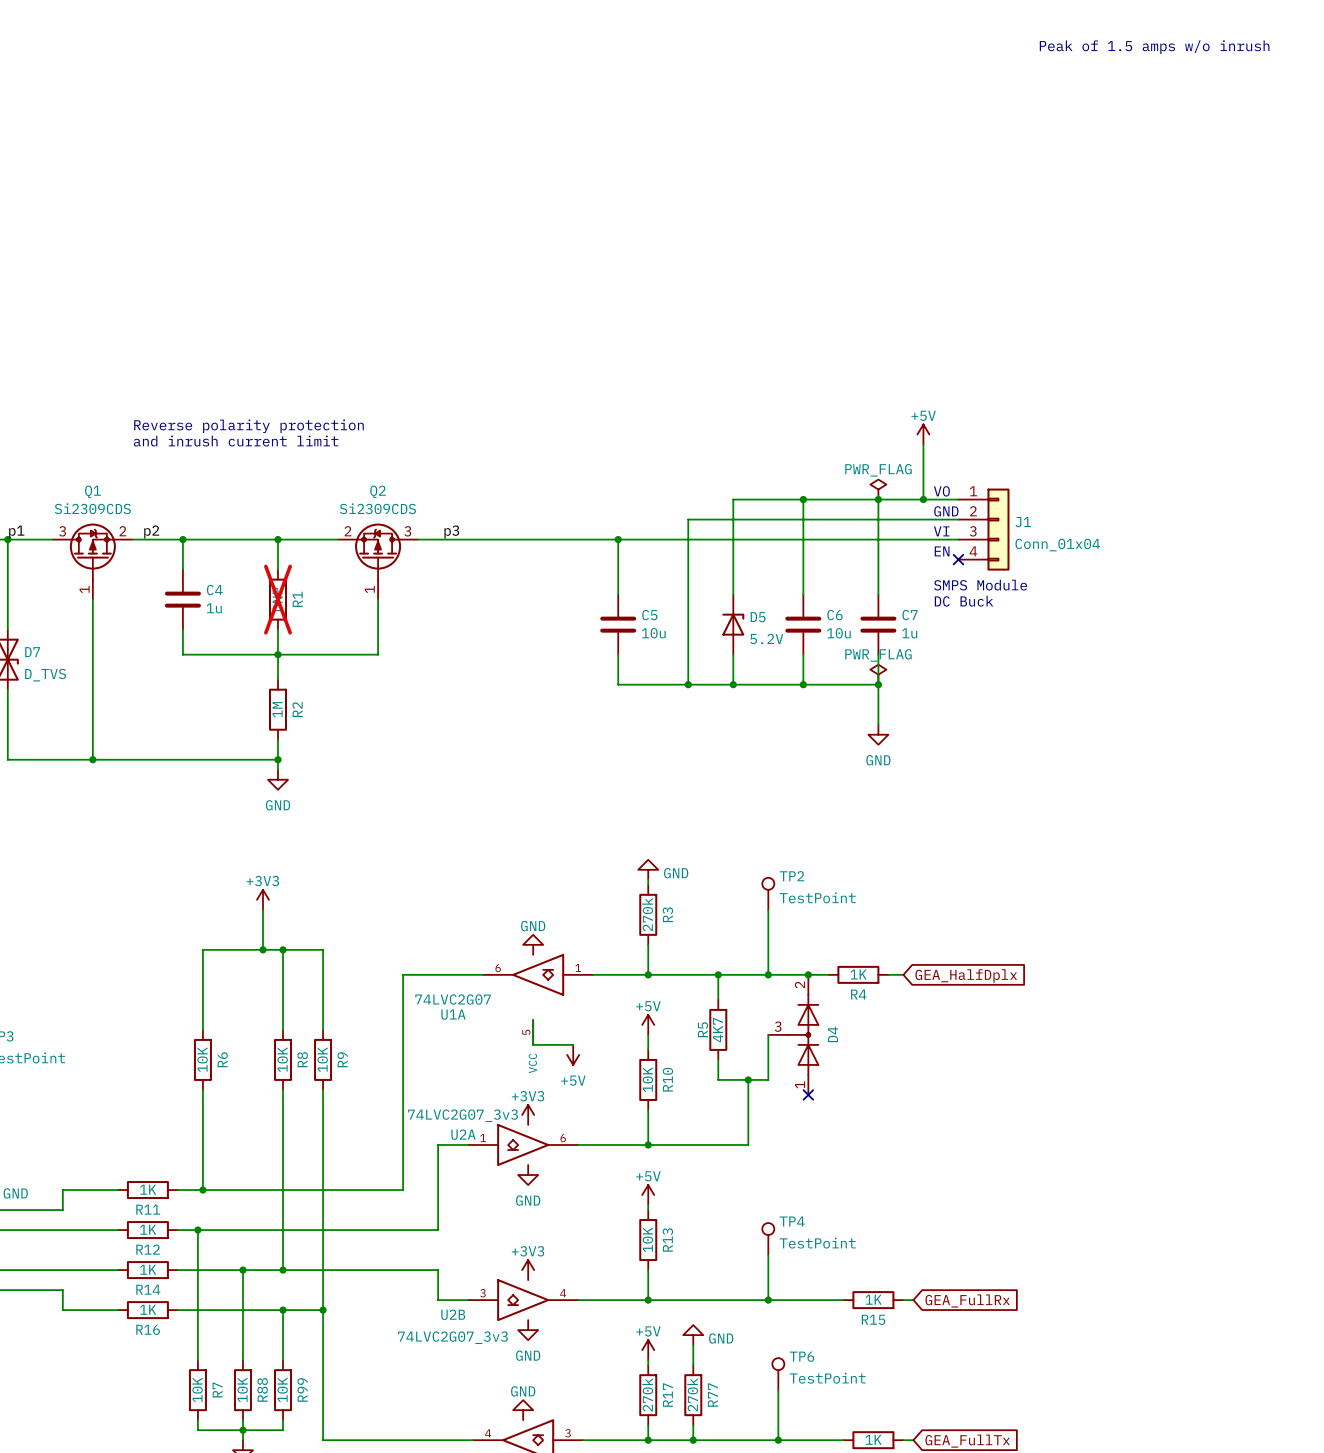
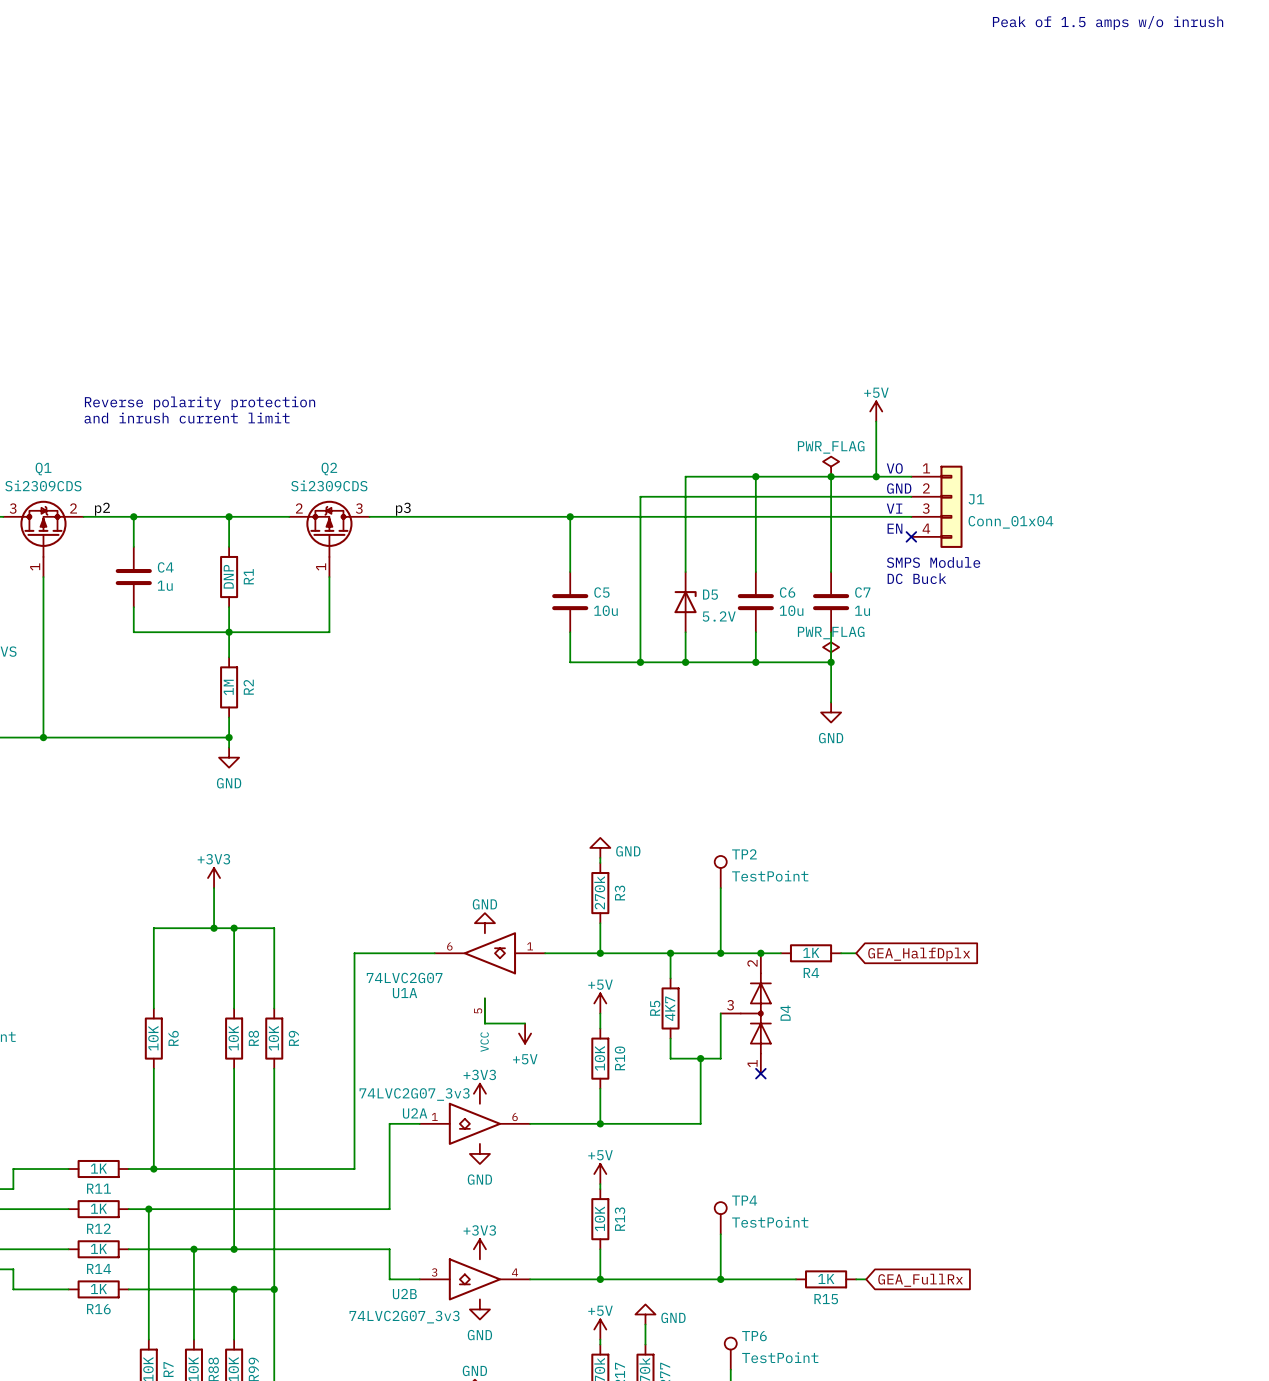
R1 do-not-place cross: (278, 599) -> none

